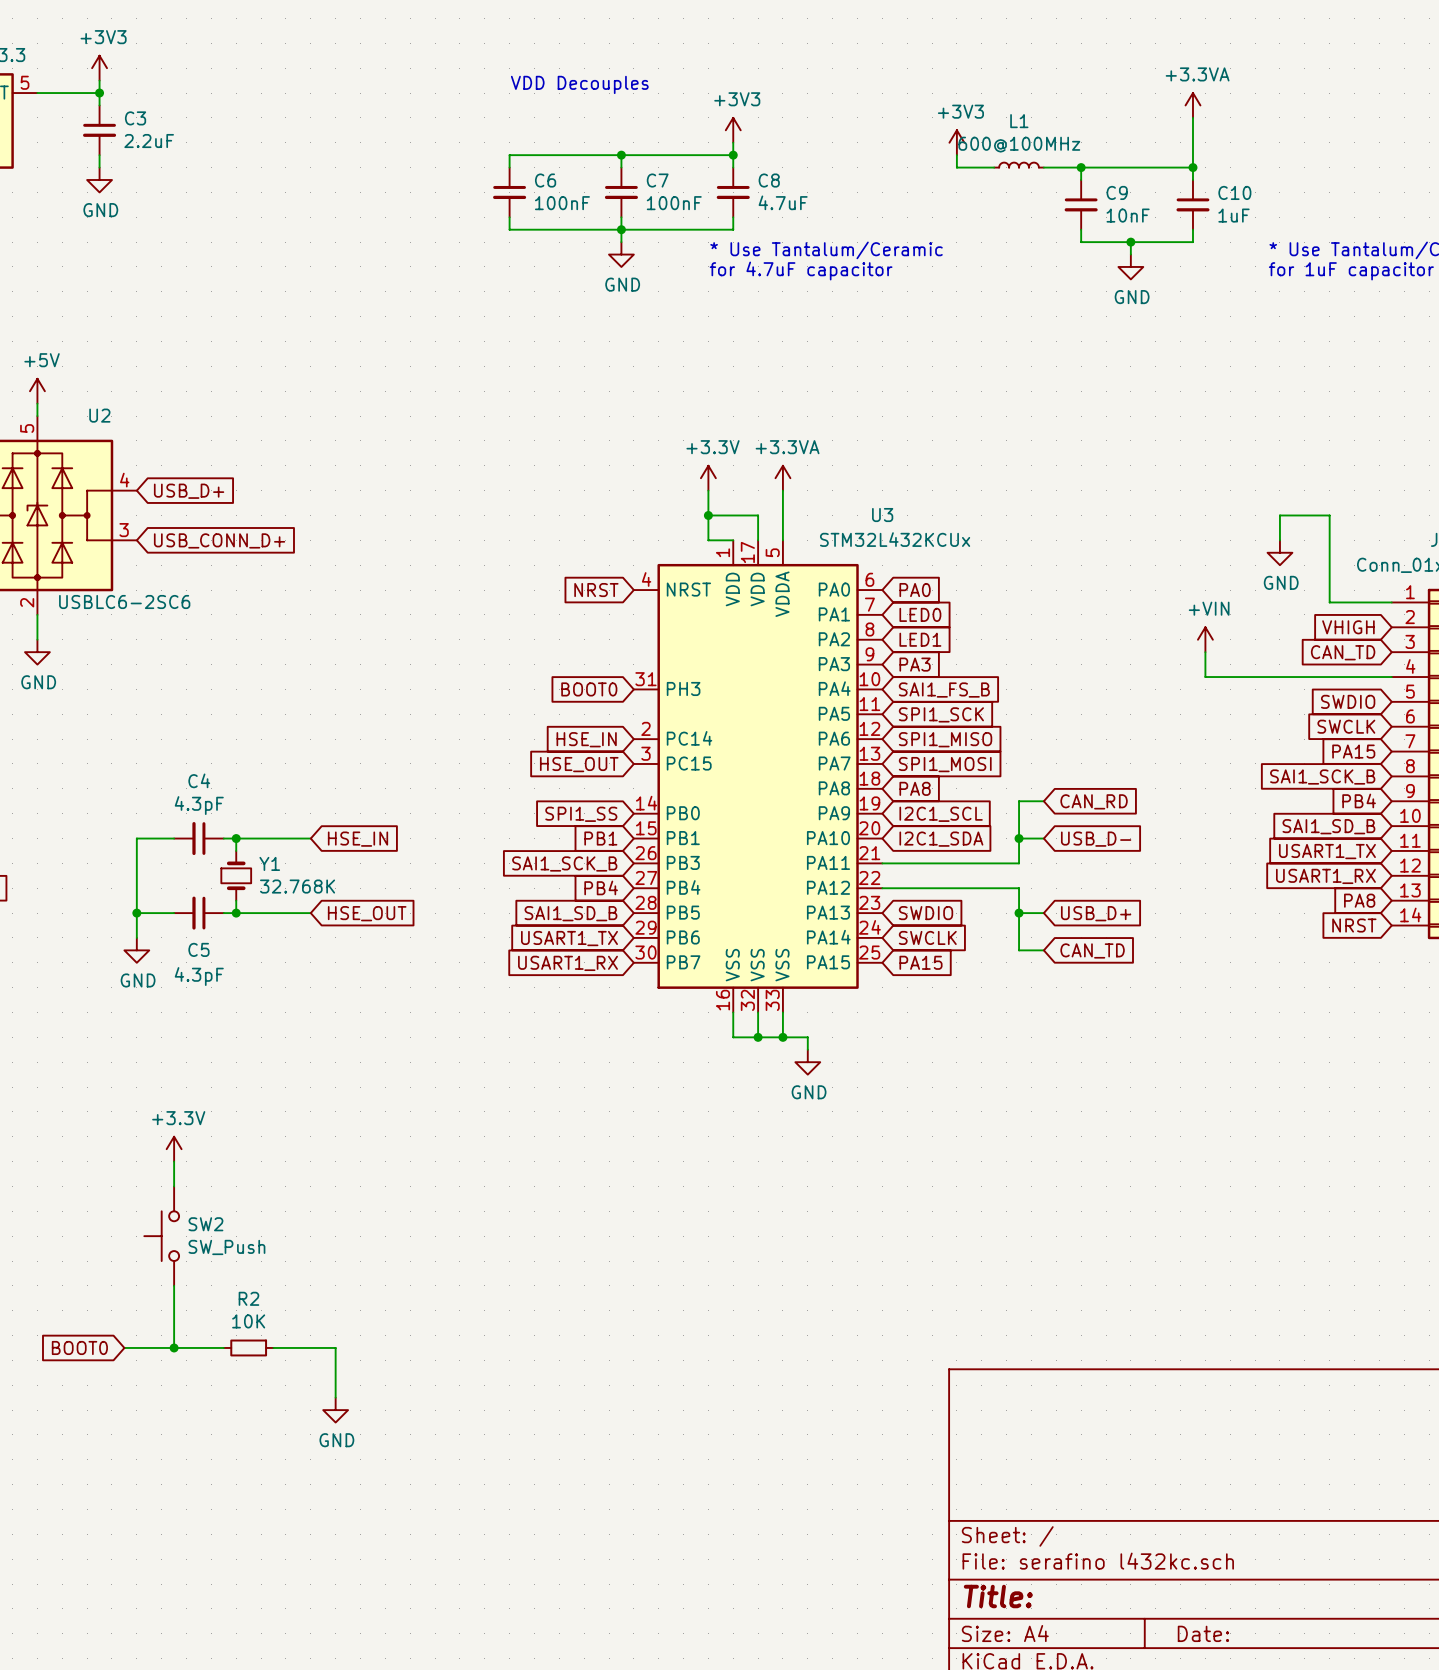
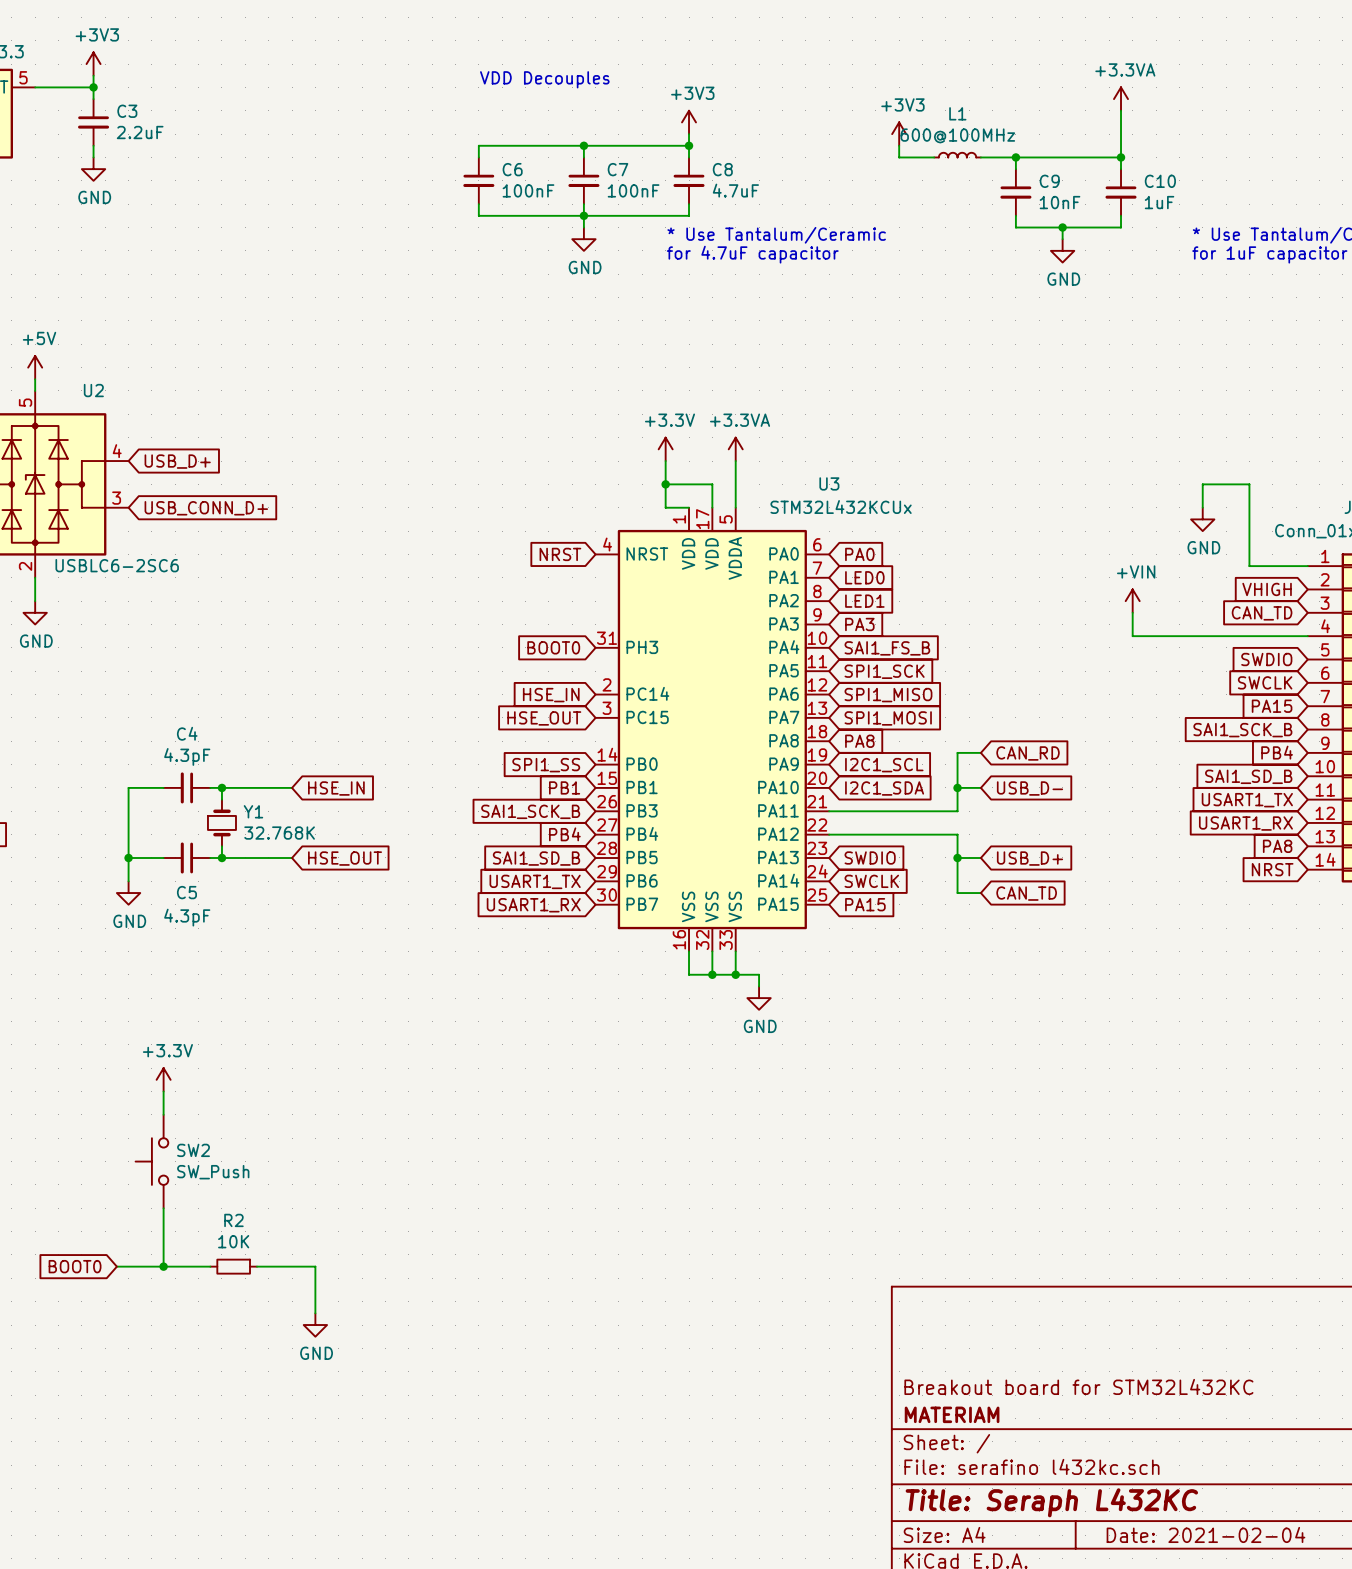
title block: none -> Breakout board for STM32L432KC (1078, 1386)
title block: none -> MATERIAM (952, 1414)
title block: Title: (998, 1596) -> Title: Seraph L432KC (1051, 1502)
title block: Date: (1203, 1633) -> Date: 2021-02-04 (1205, 1534)

